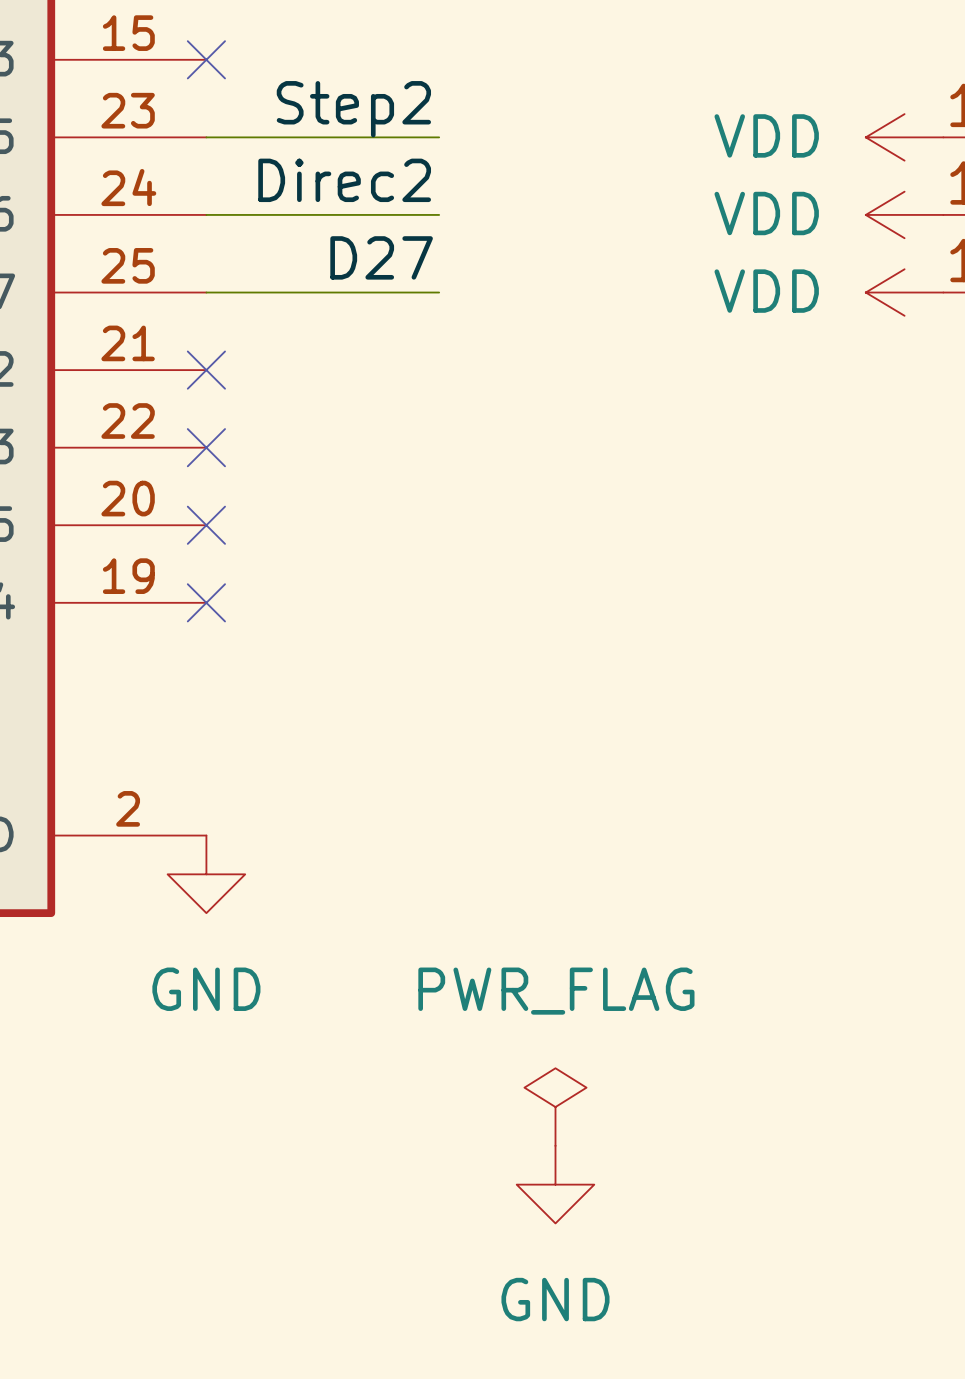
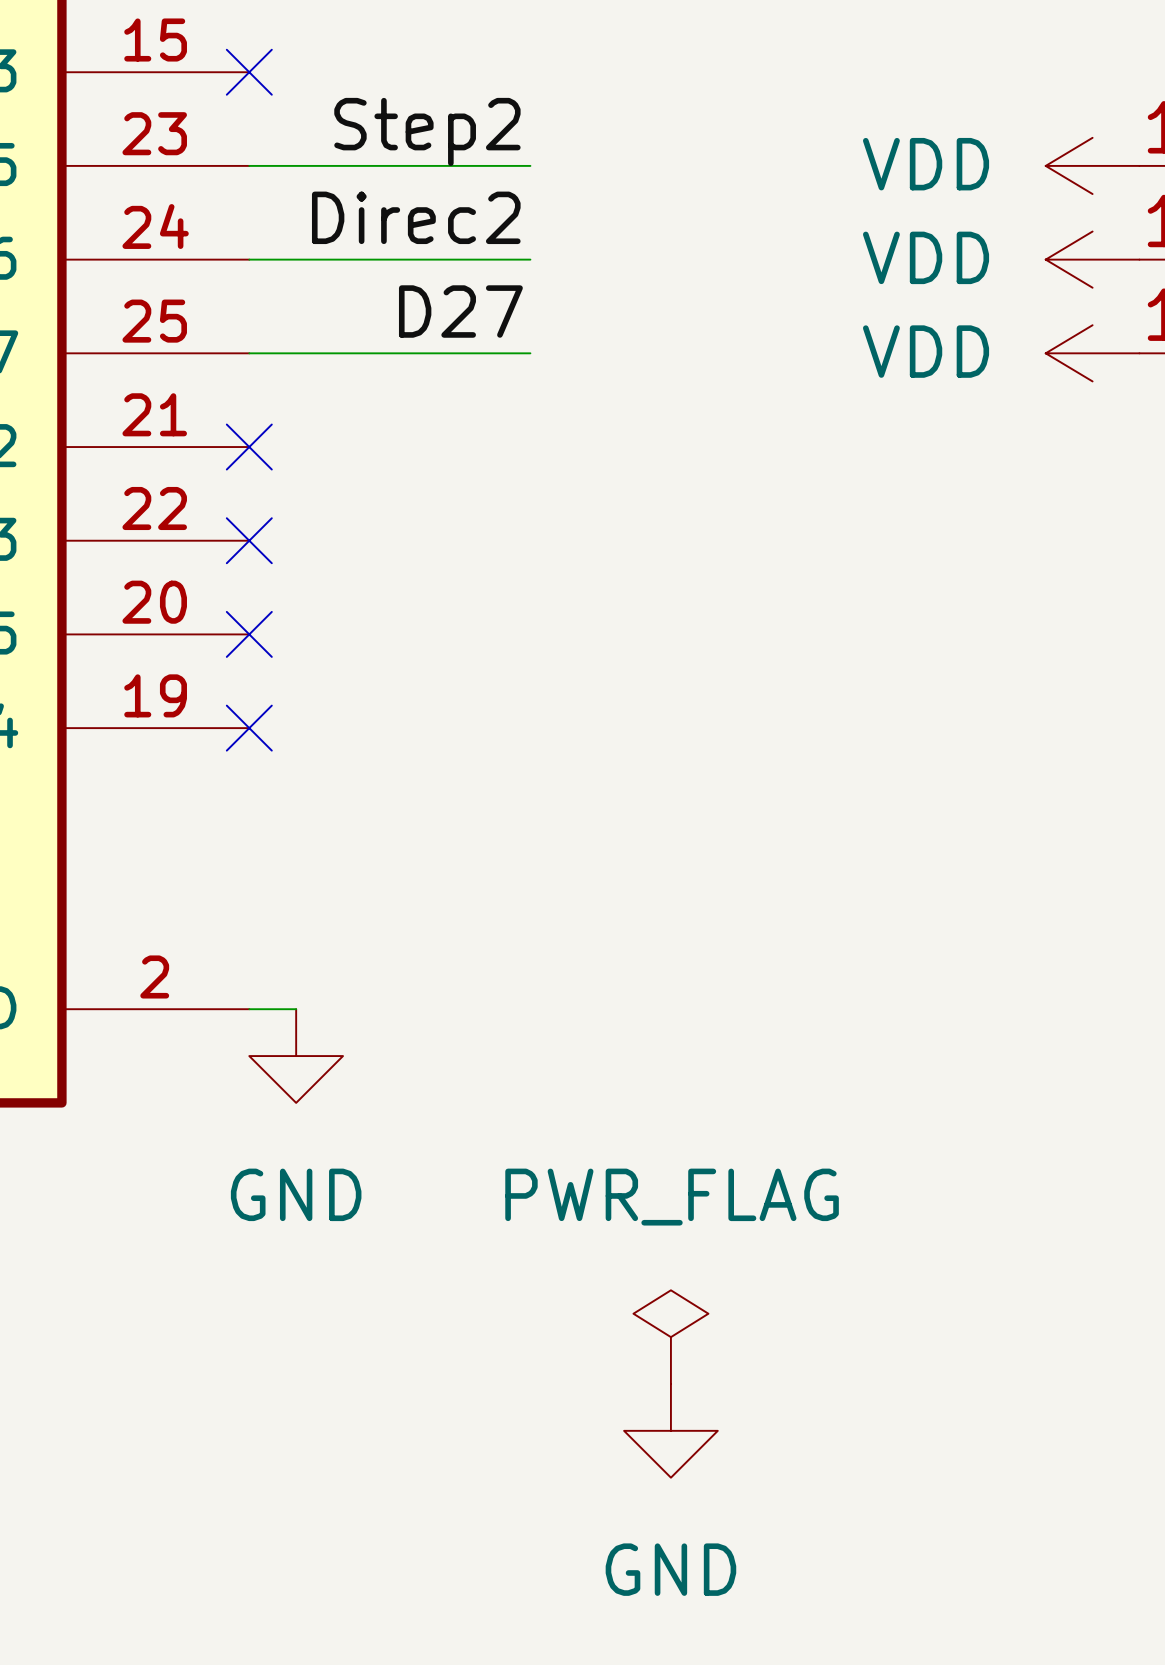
wire: none -> (249, 1009) (296, 1009)
power symbol position: GND (206, 874) -> GND (296, 1056)

